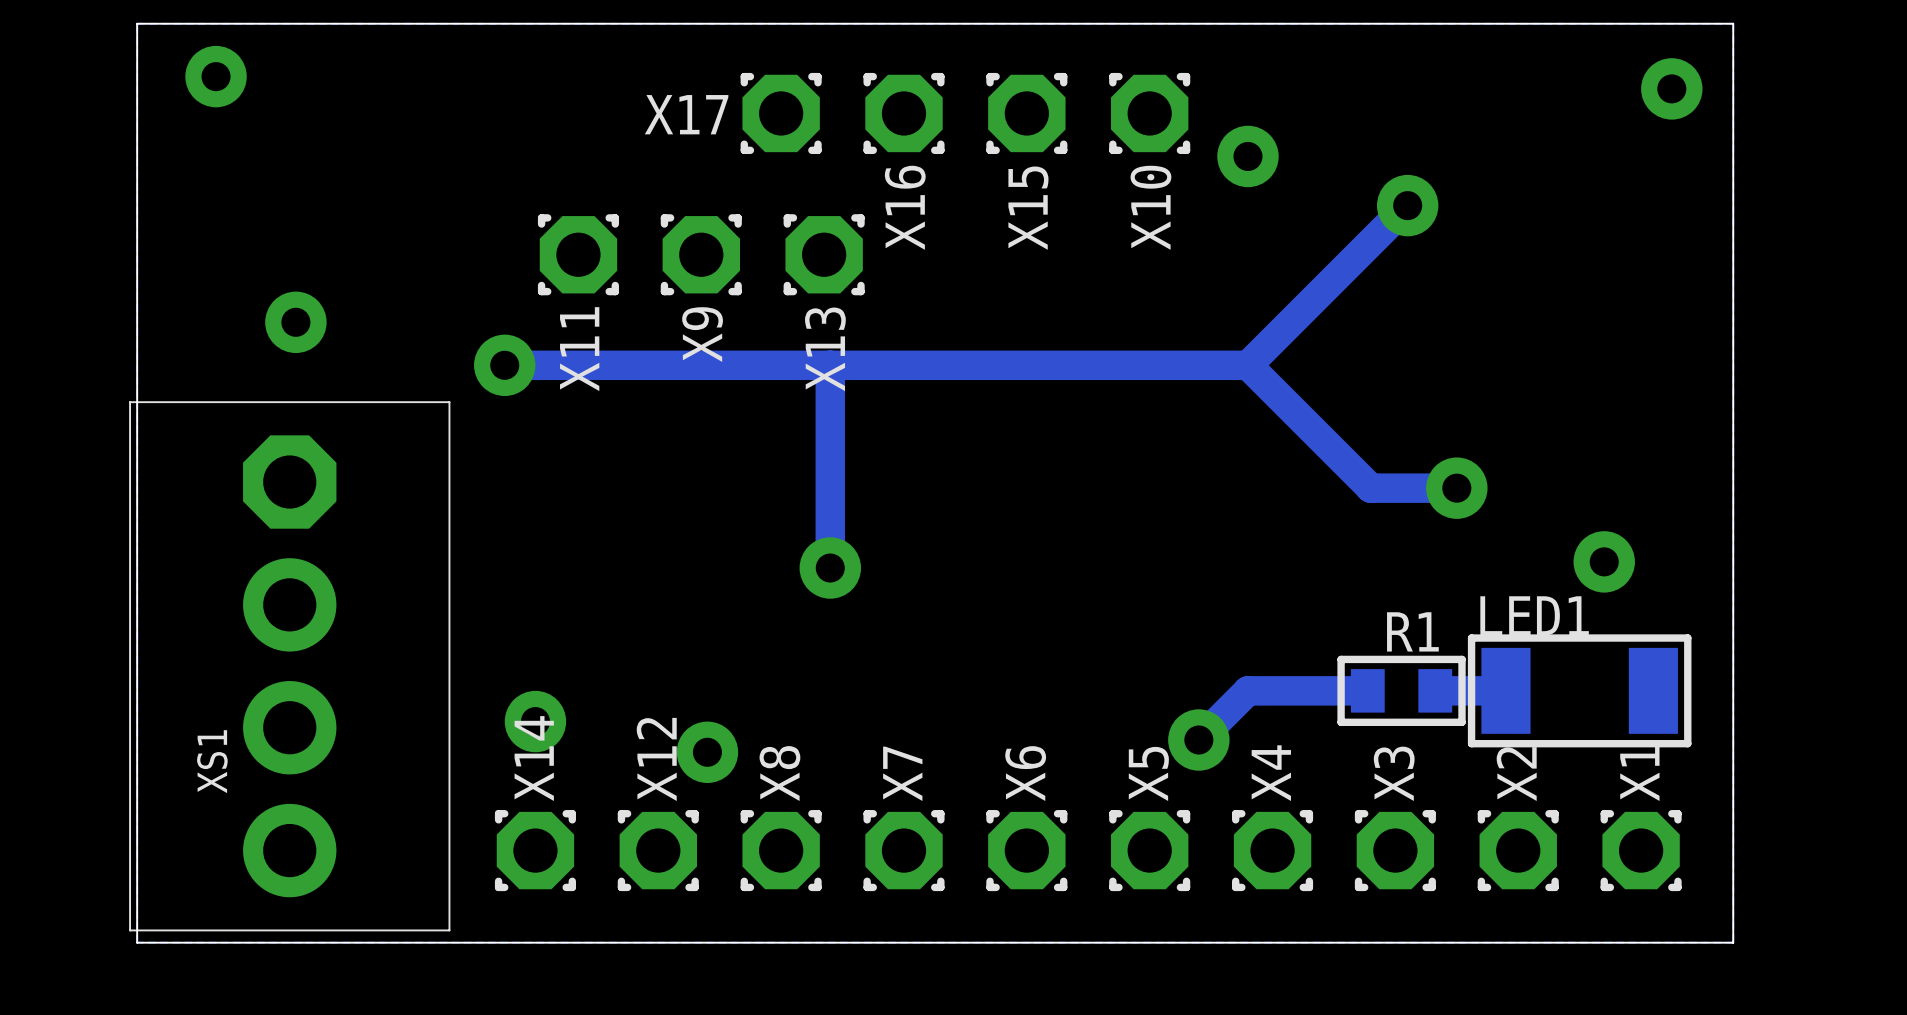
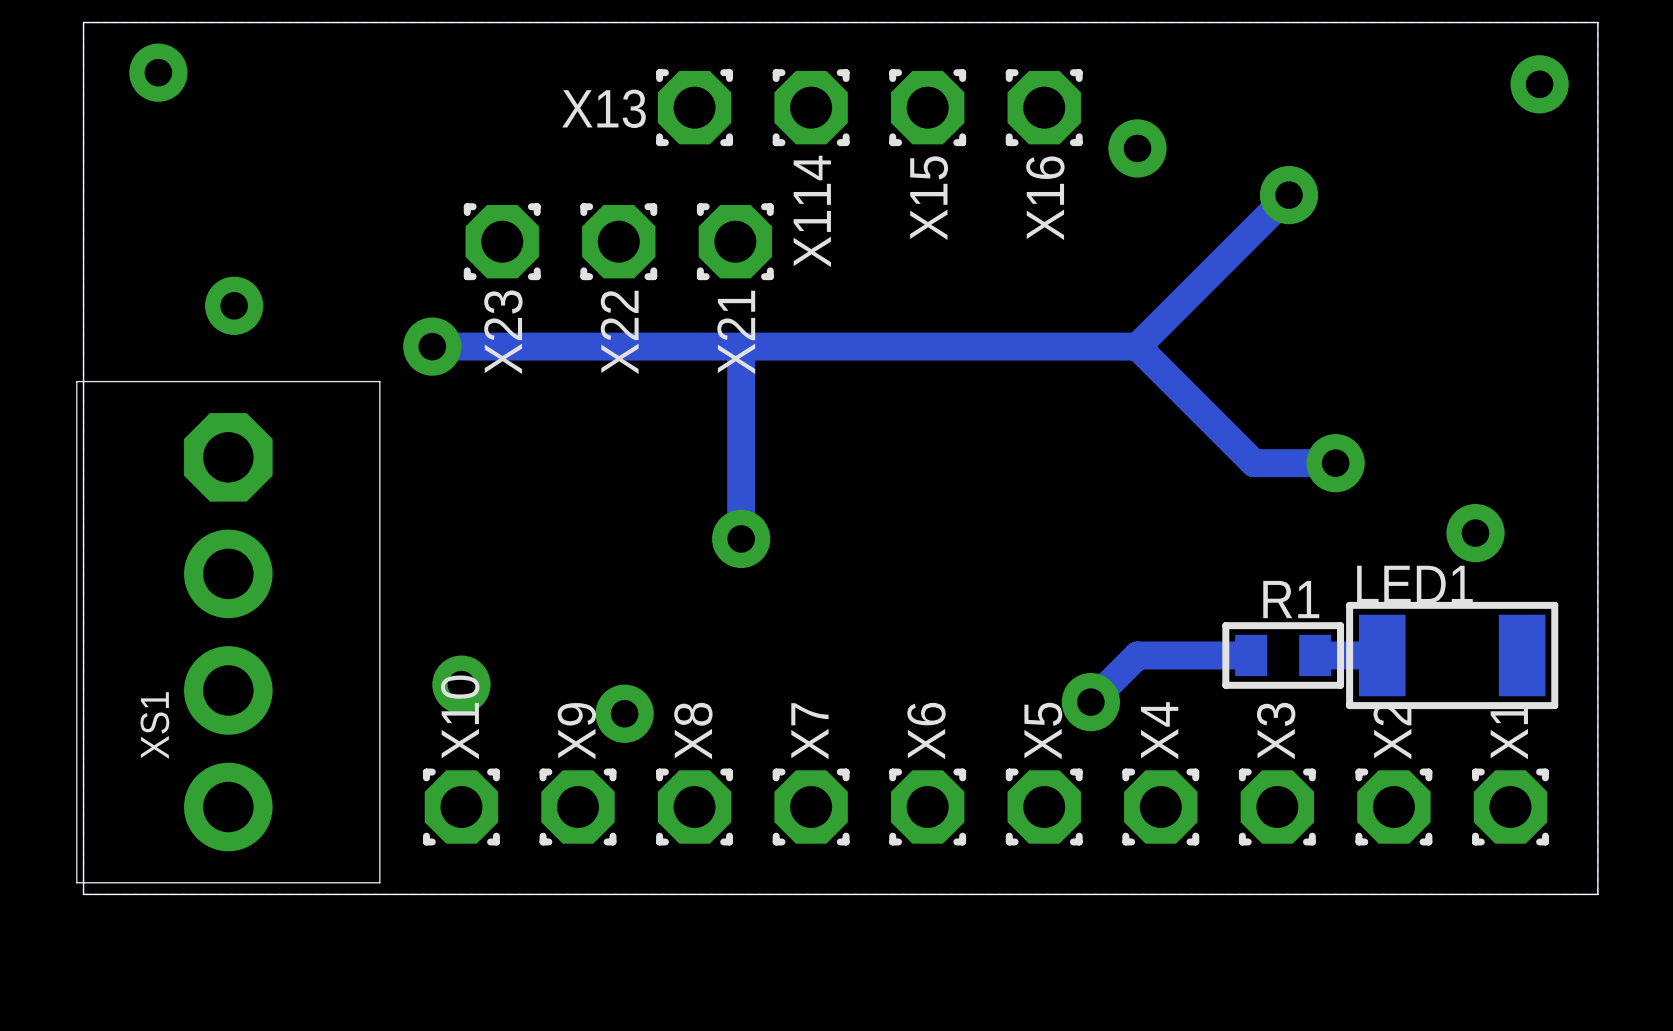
X17 name: X17 (686, 114) -> X13 (604, 108)
X16 name: X16 (905, 207) -> X114 (812, 211)
X10 name: X10 (1150, 207) -> X16 (1045, 198)
X9 name: X9 (702, 334) -> X22 (619, 332)
X11 name: X11 (579, 349) -> X23 (503, 332)
X13 name: X13 (825, 349) -> X21 (736, 332)
X14 name: X14 (534, 758) -> X10 (460, 717)
X12 name: X12 (656, 759) -> X9 (576, 731)

